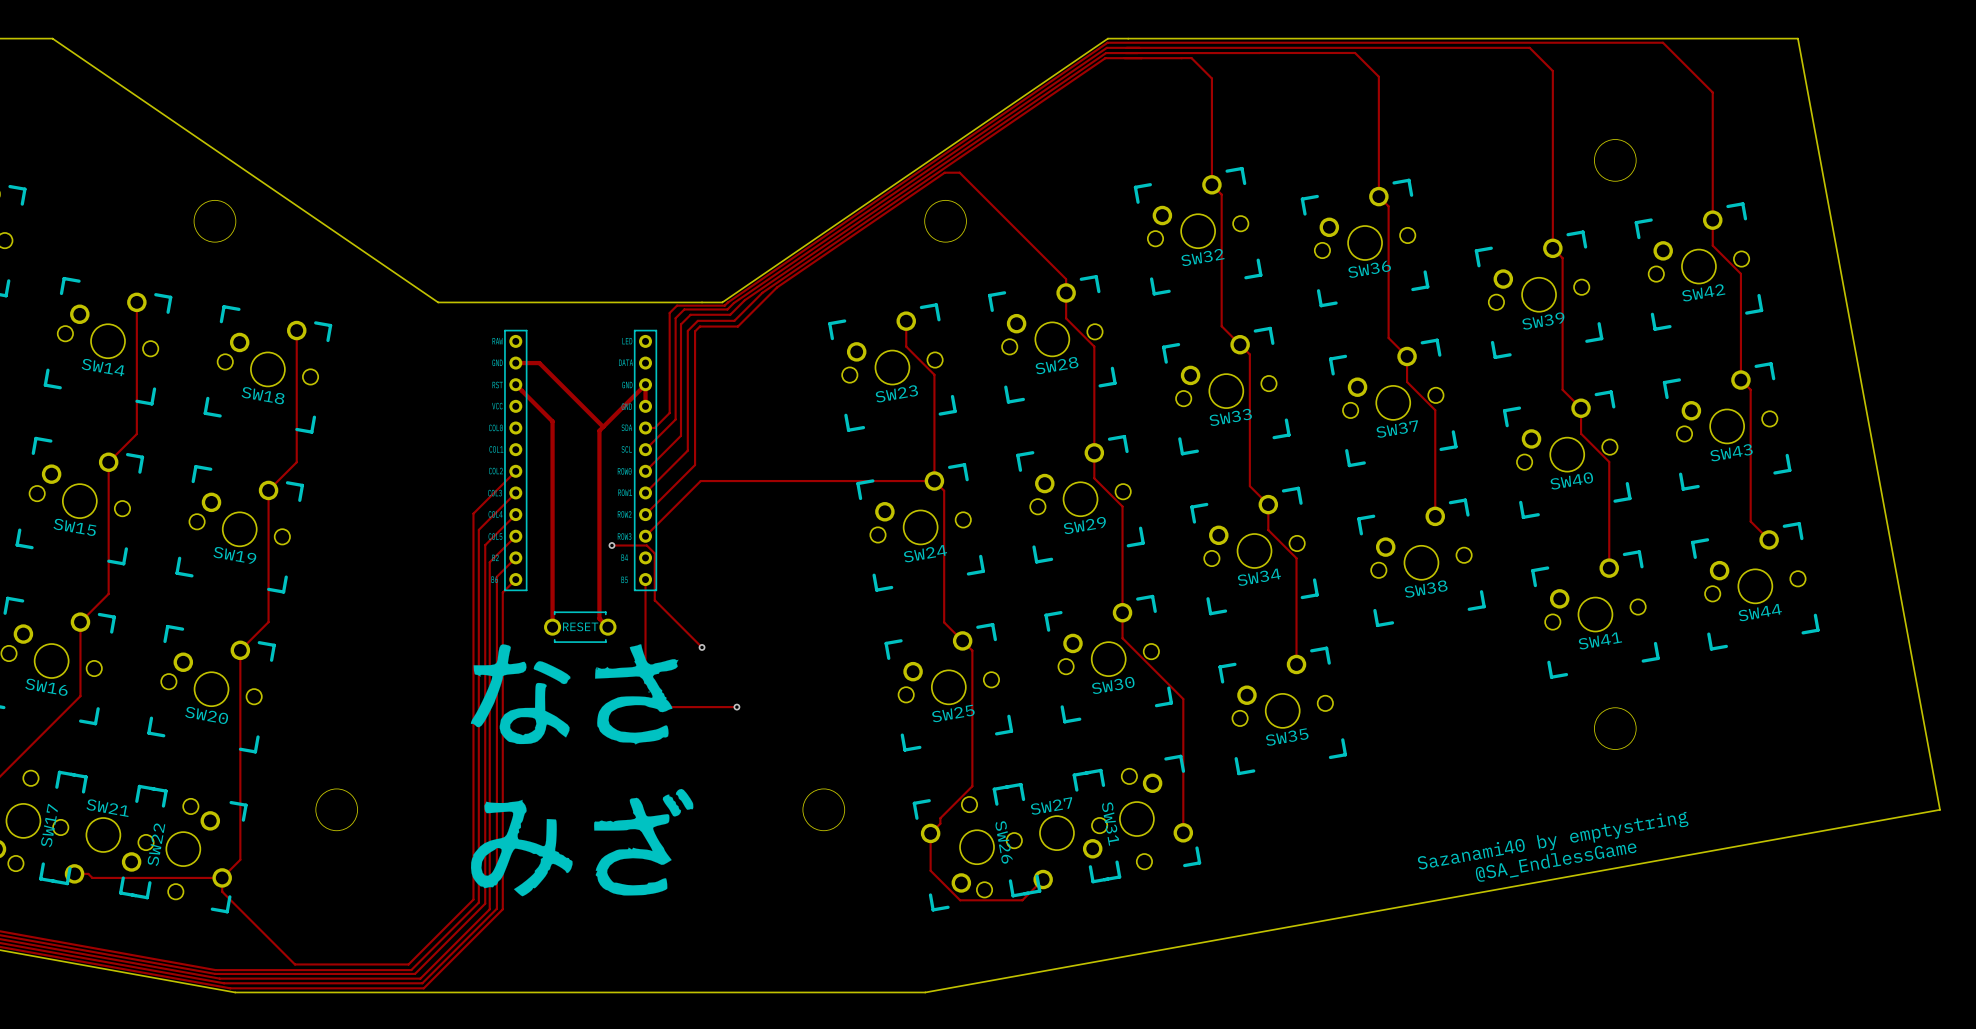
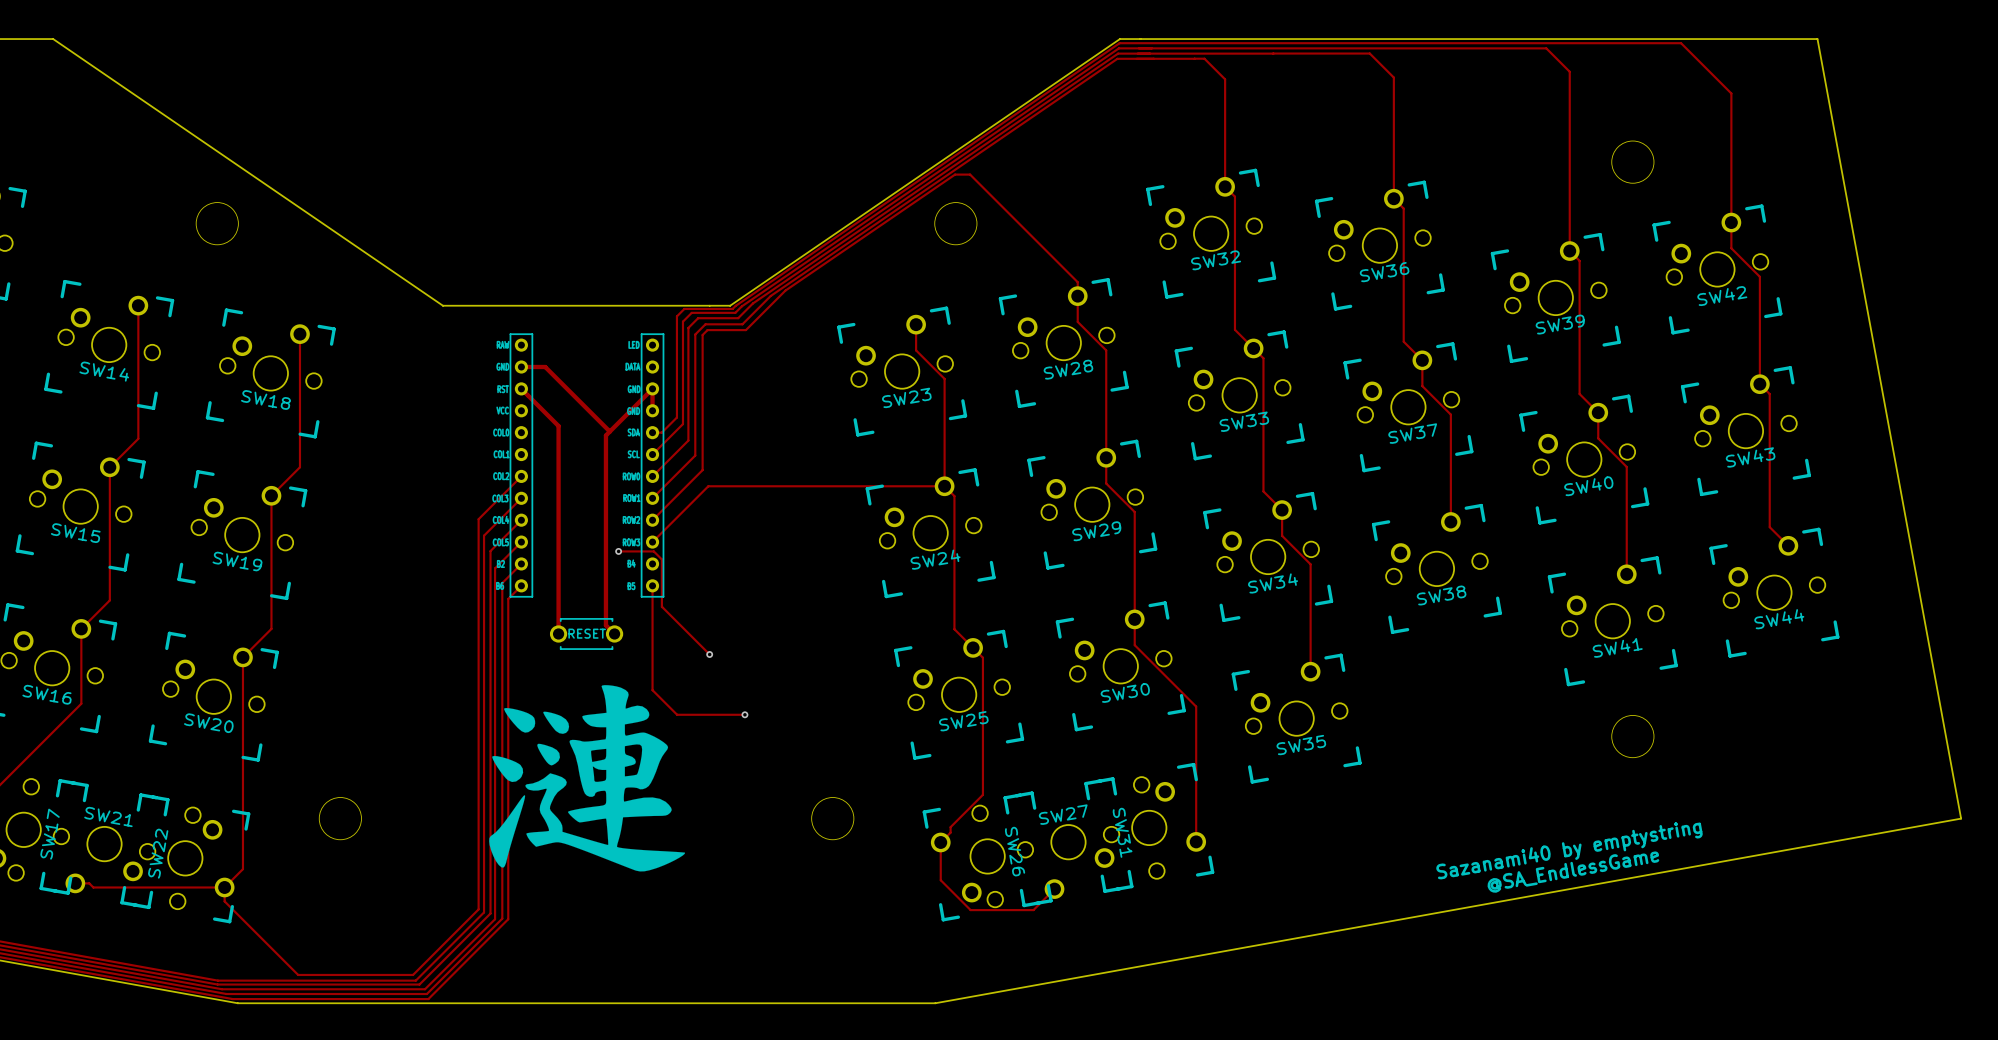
drawing shape: [470, 644, 694, 897] -> [489, 685, 686, 872]

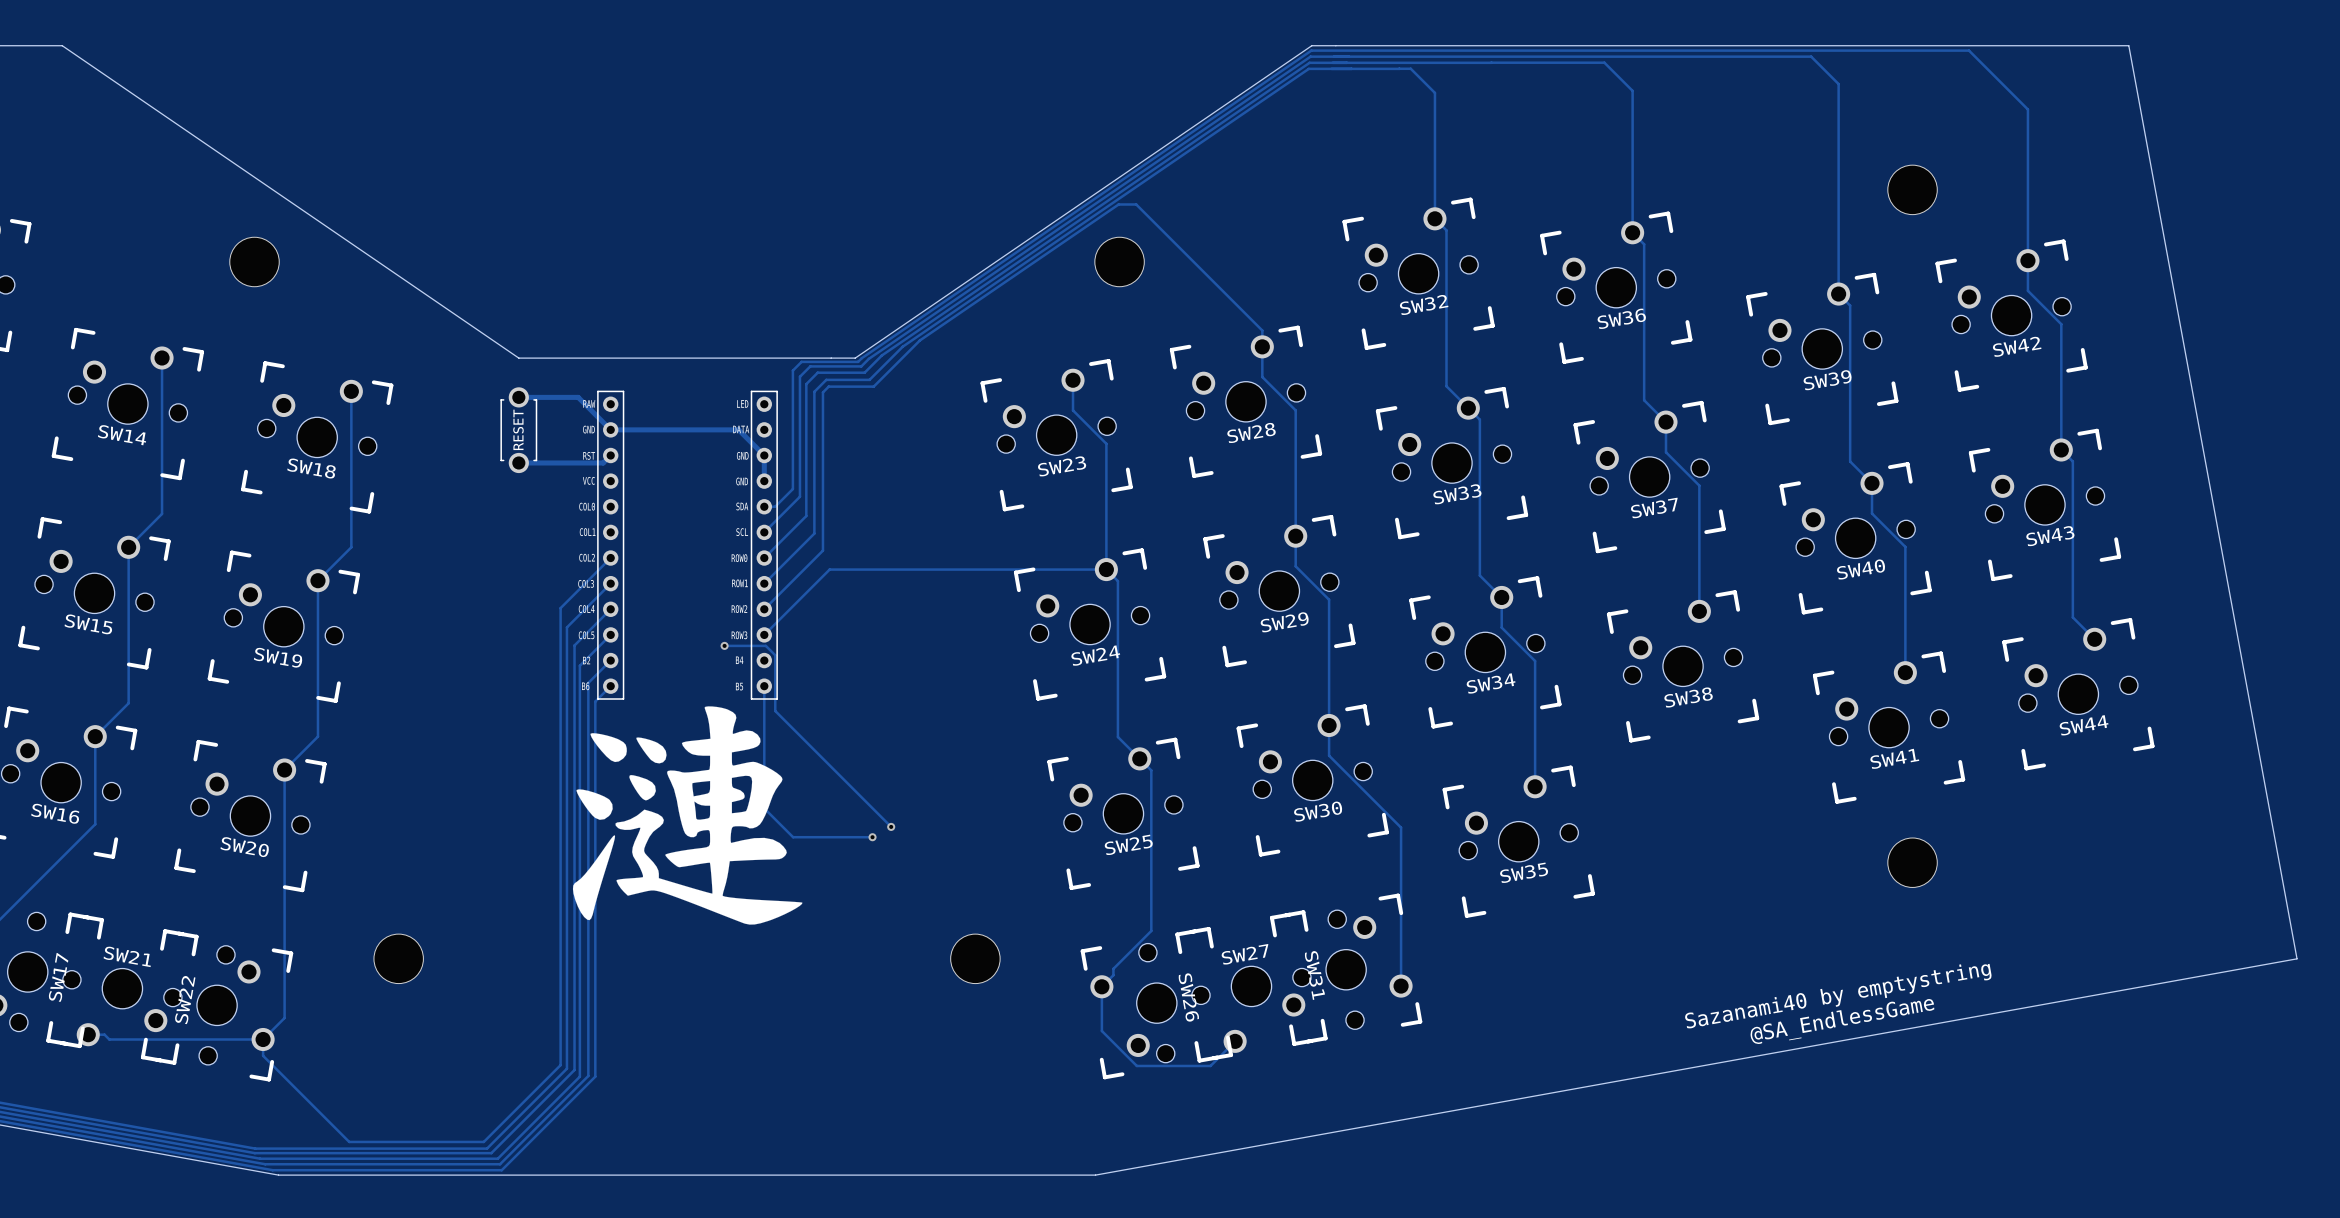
track: none -> (518, 397) (578, 397) (610, 429)
part: none -> (518, 430)
track: (545, 367) (609, 431) -> (638, 429) (738, 429) (764, 455)
track: (521, 388) (558, 426) (558, 633) -> (610, 455) (603, 462) (518, 462)
track: (652, 388) (605, 435) (605, 625) (614, 633) -> none
track: (661, 607) (709, 654) -> (775, 711) (891, 826)
part: (586, 633) -> none
via: (709, 654) -> none
via: none -> (891, 826)
drawing position: (587, 778) -> (687, 815)

